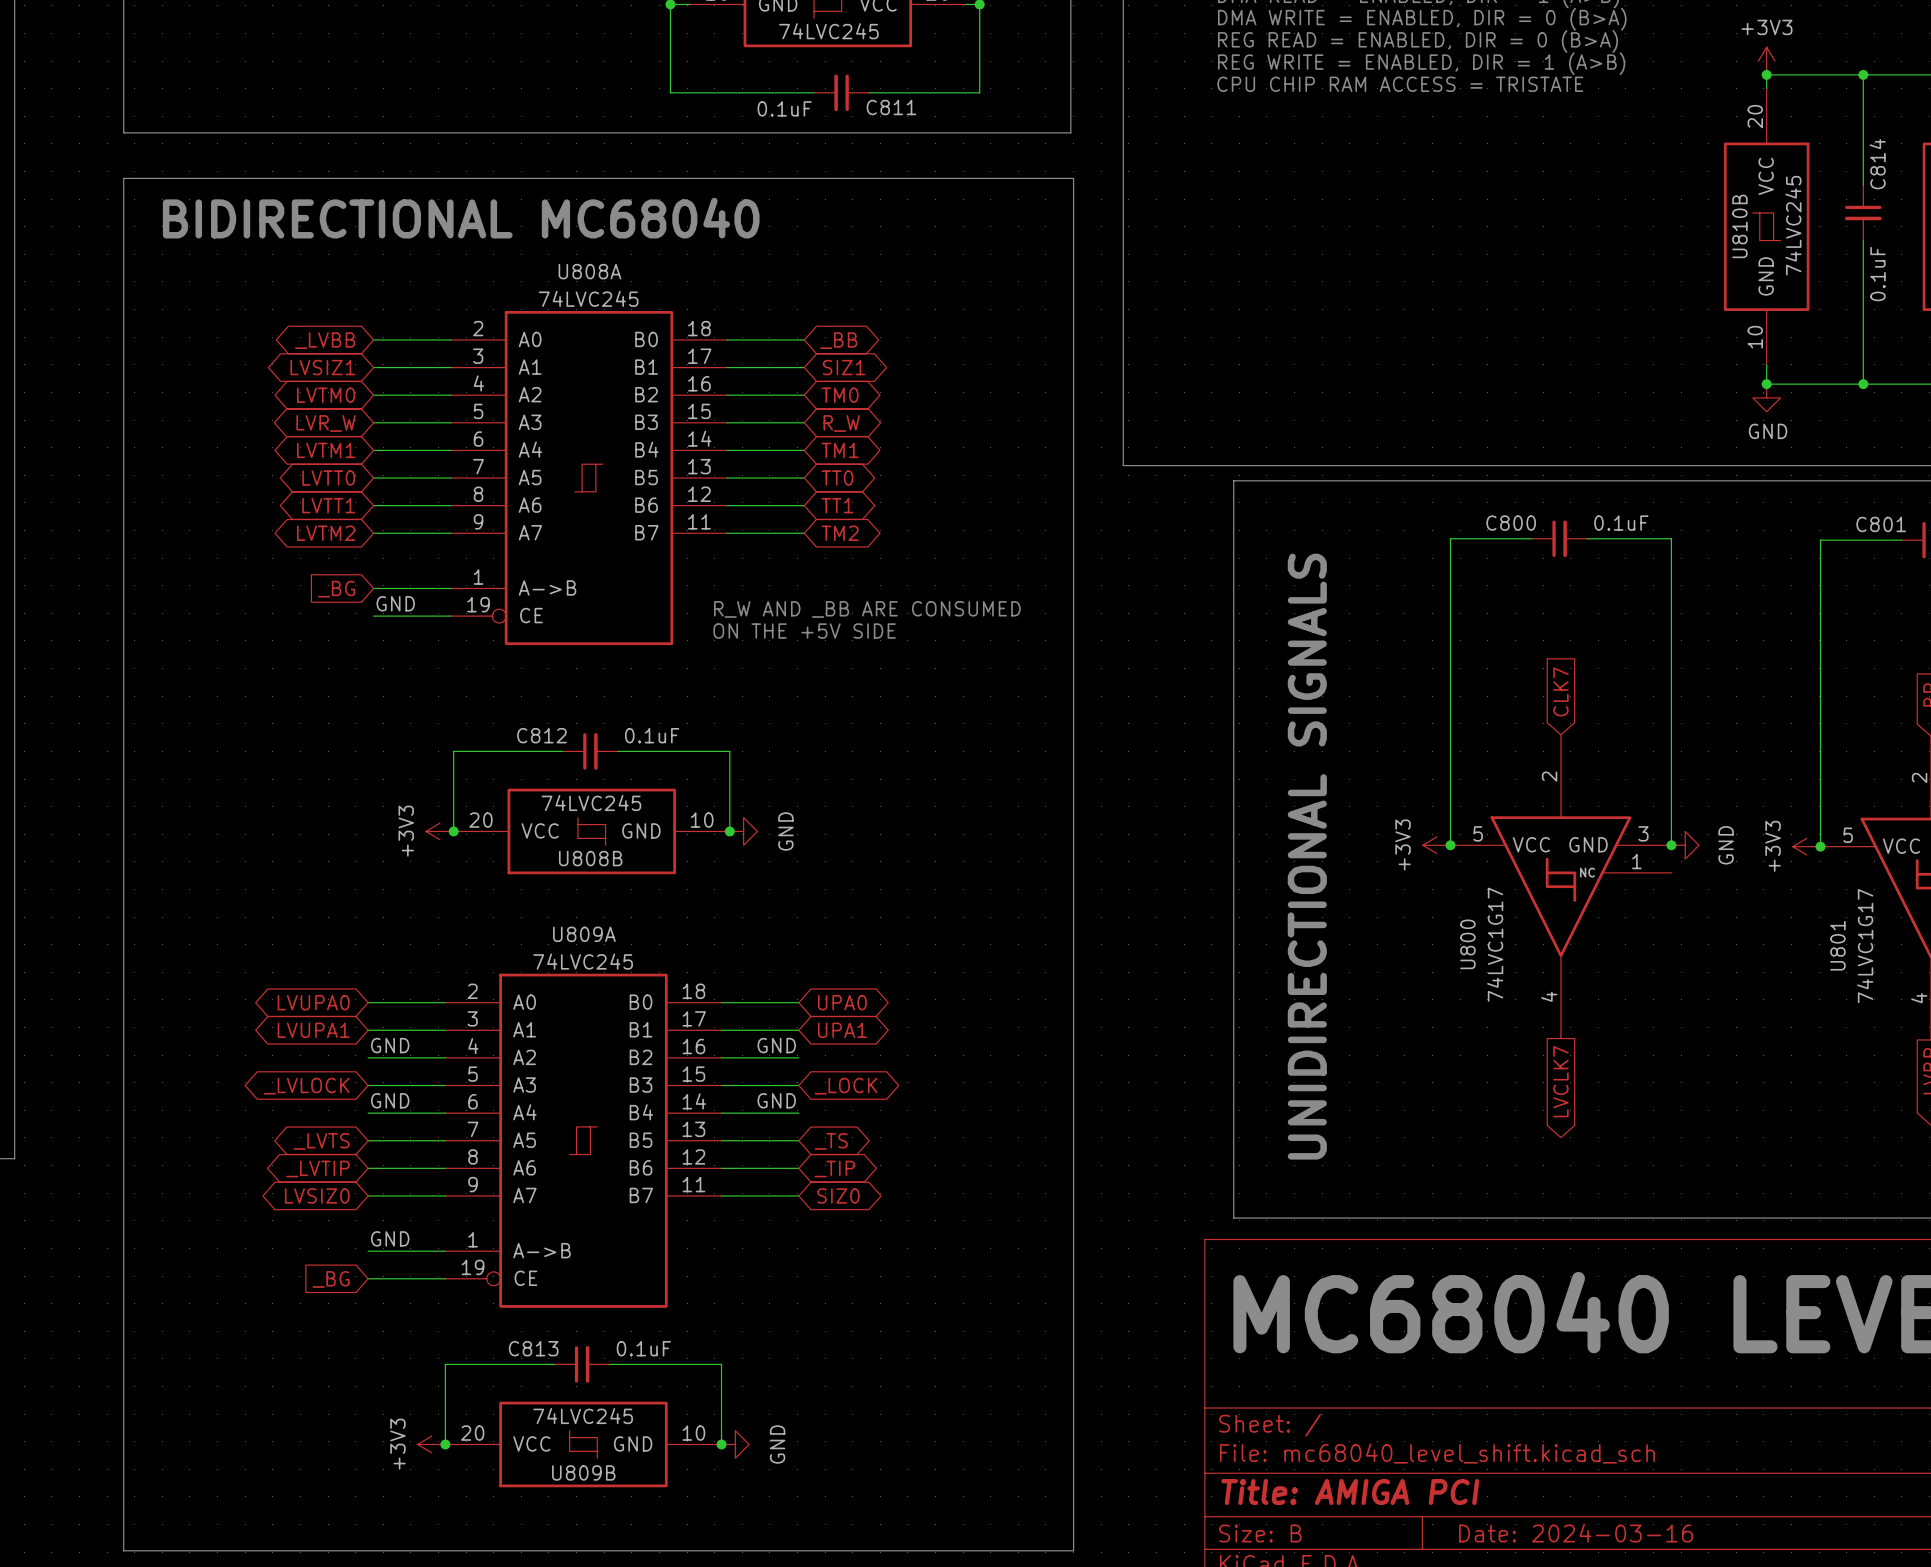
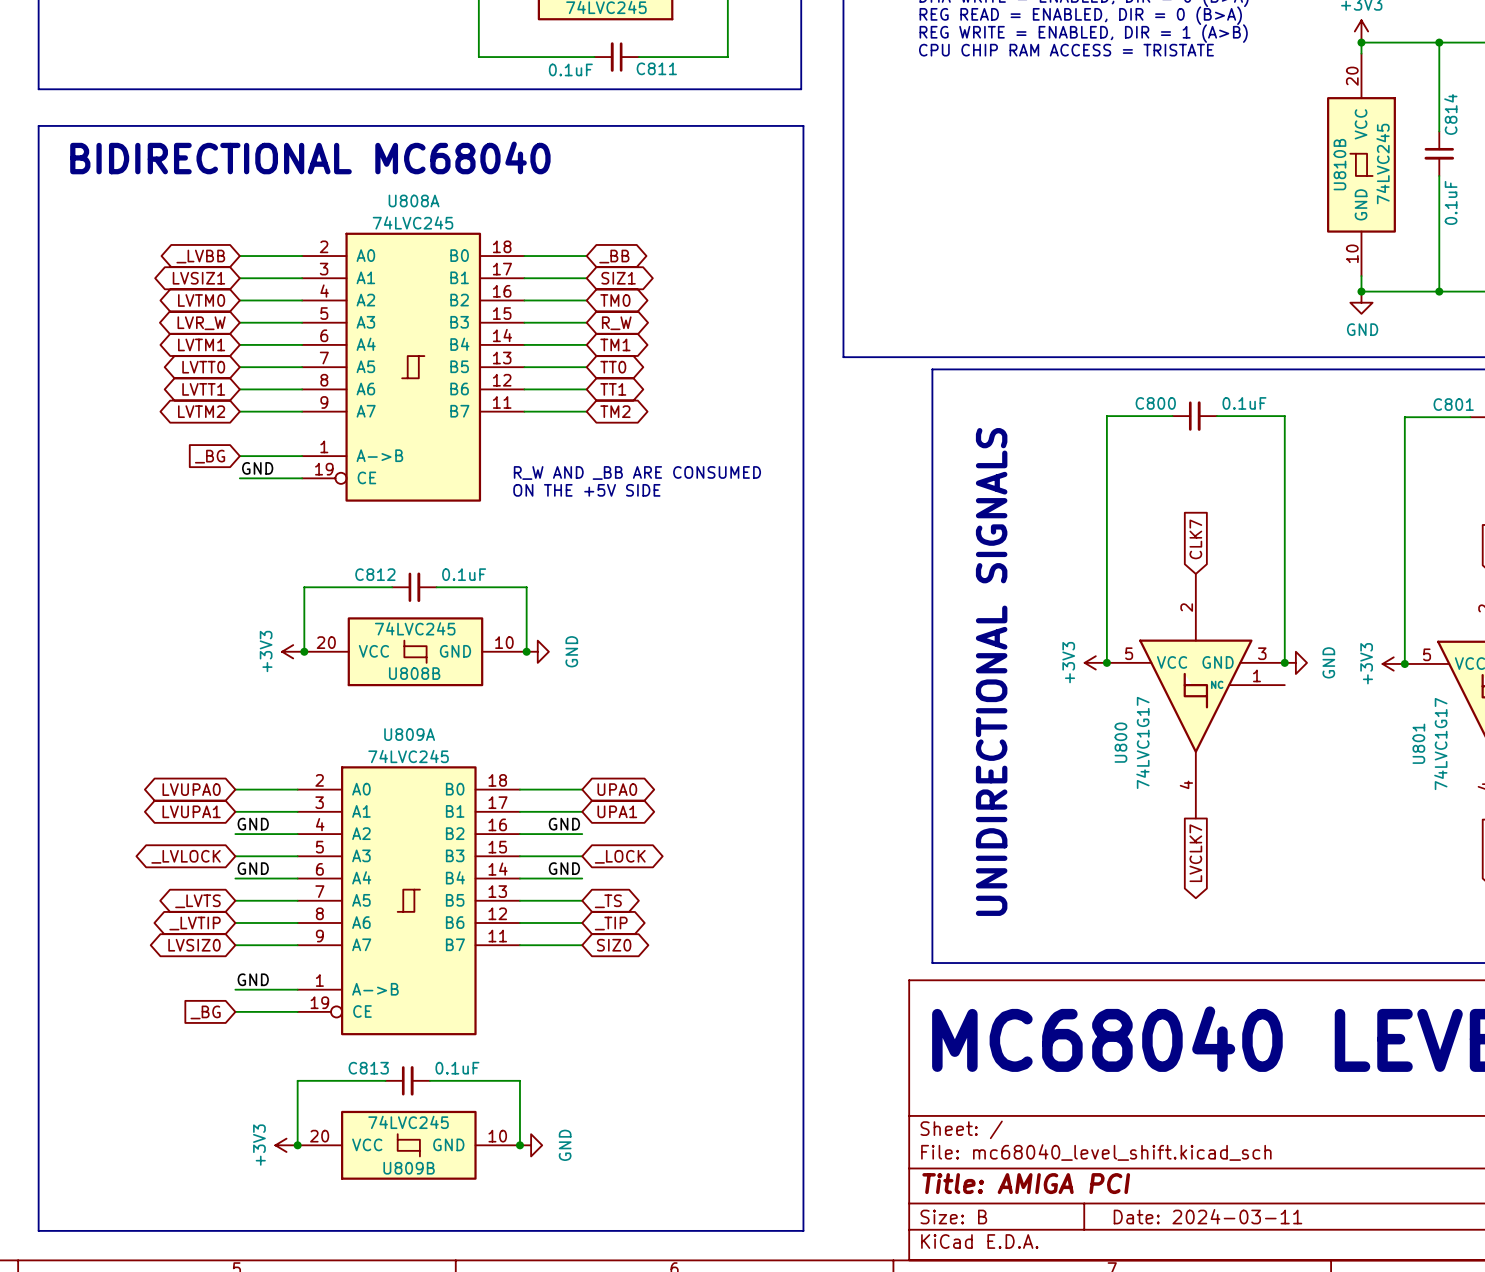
title block: Date: 2024-03-16 (1576, 1533) -> Date: 2024-03-11 (1207, 1216)

